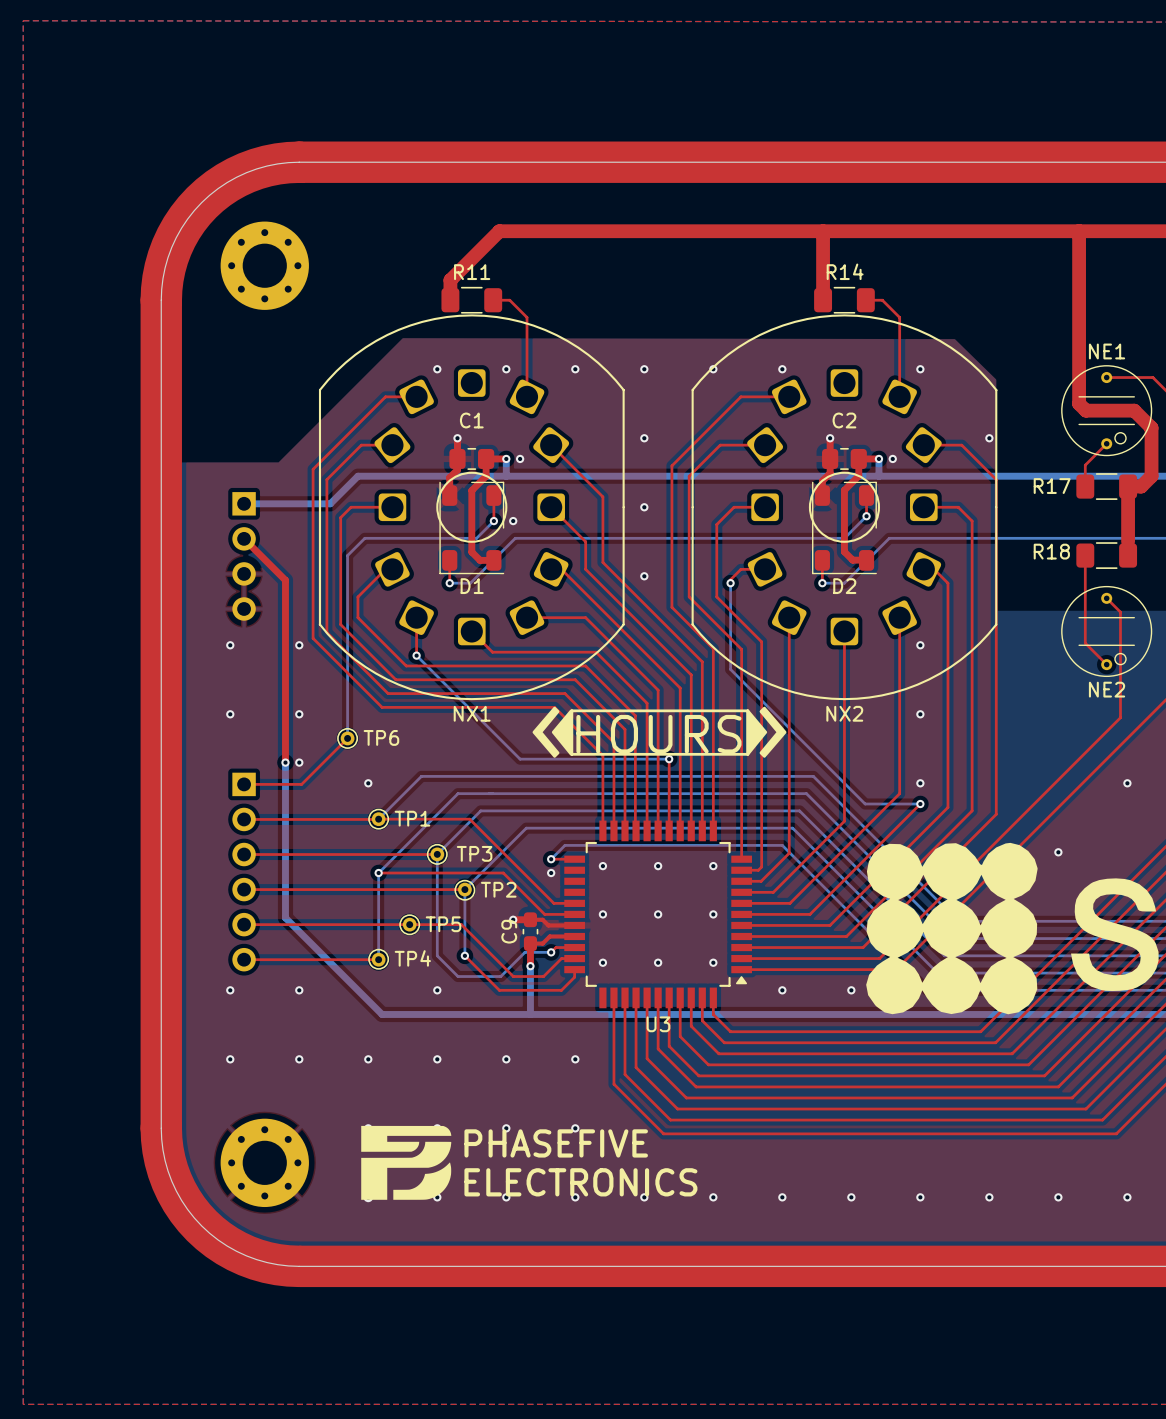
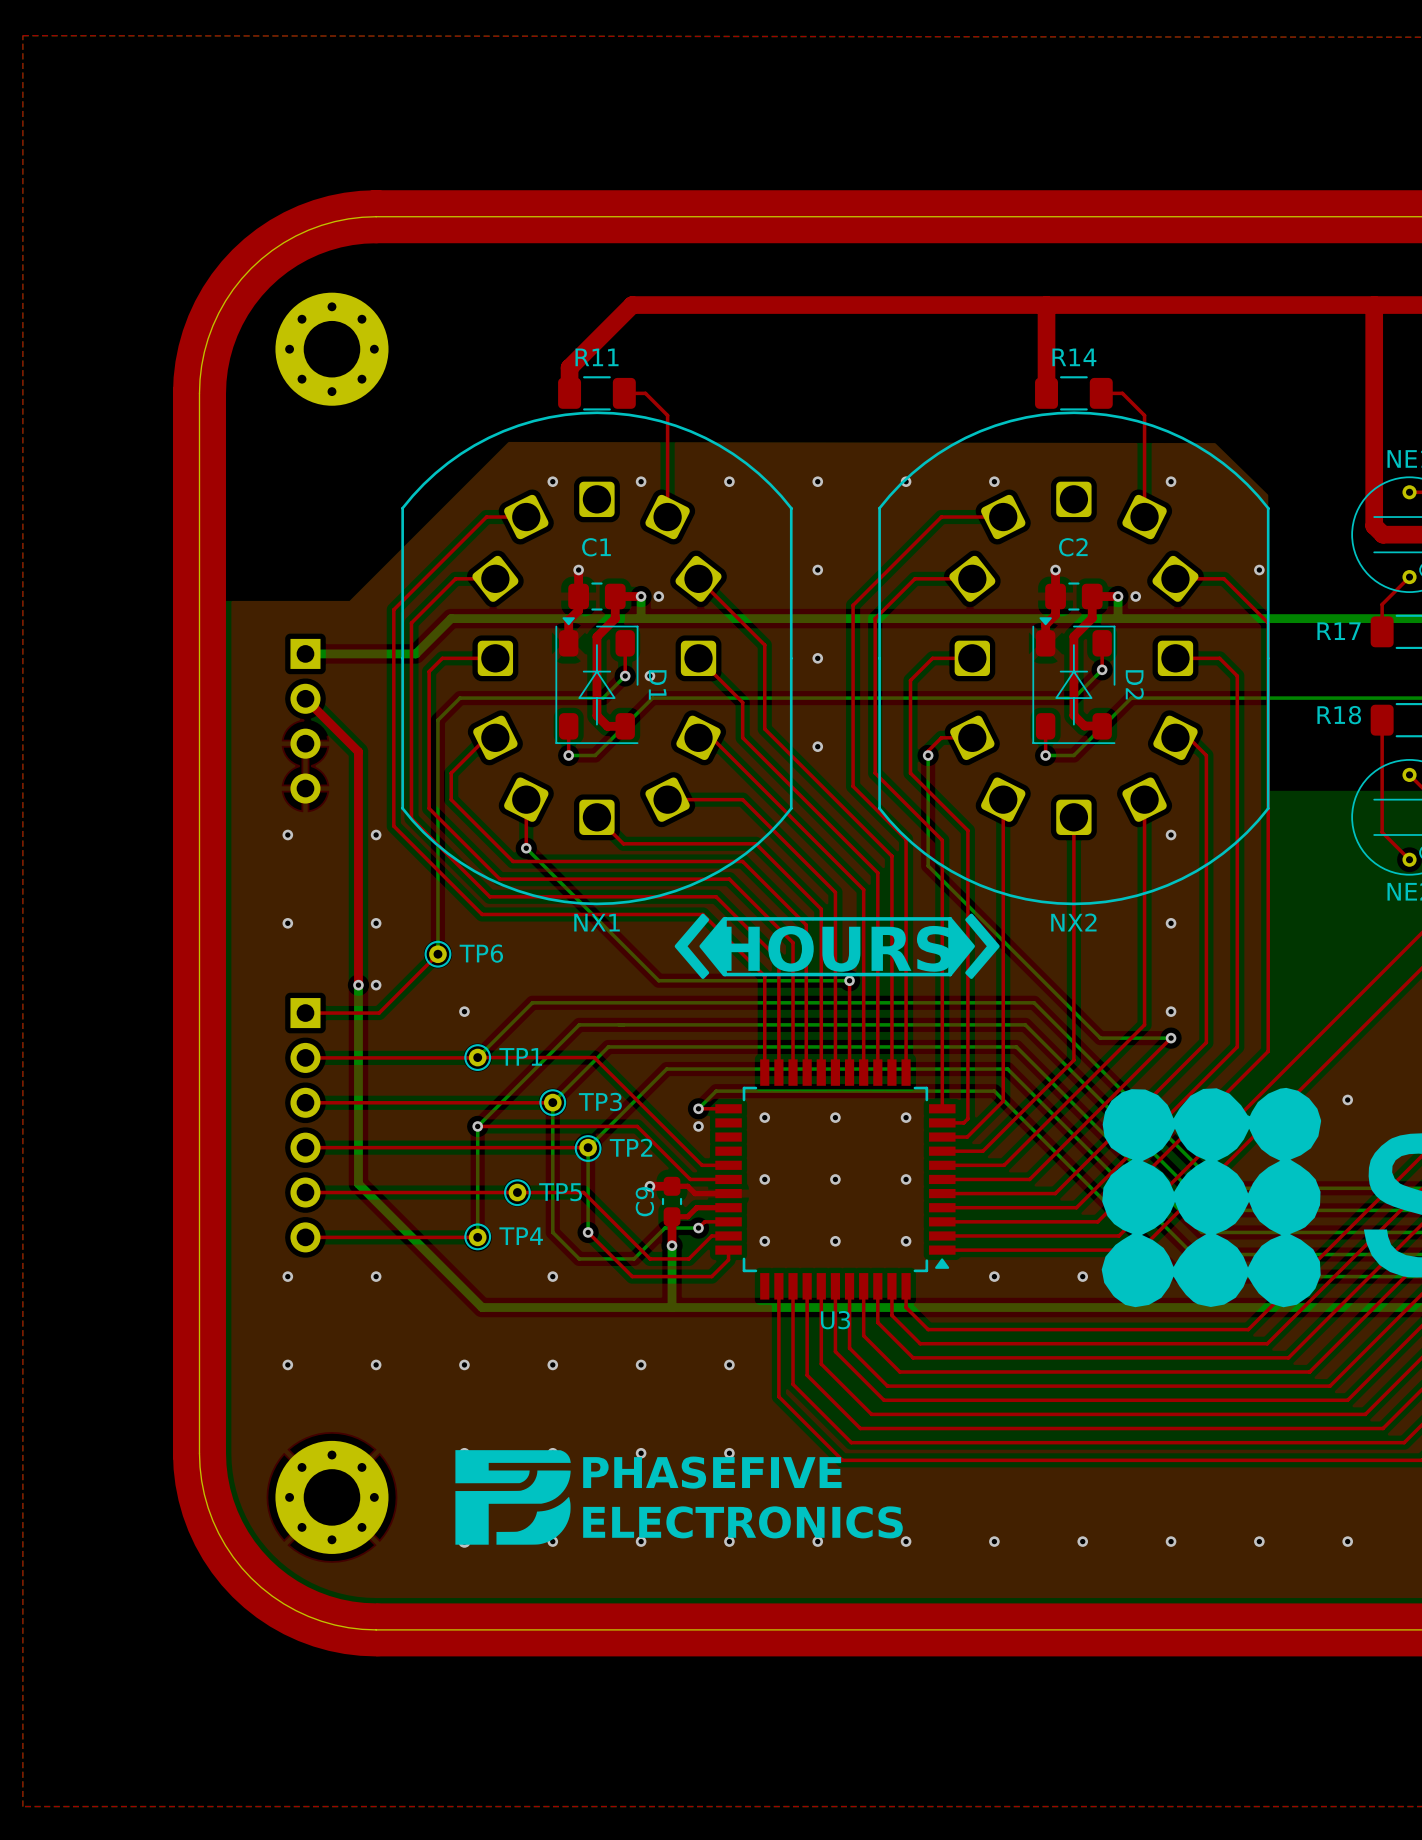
NX1 footprint: [318, 314, 625, 701] -> [401, 411, 793, 906]
NX2 footprint: [691, 314, 998, 701] -> [878, 411, 1270, 906]
D1 footprint: [439, 481, 505, 575] -> [555, 617, 639, 745]
D2 footprint: [812, 481, 877, 575] -> [1032, 617, 1116, 745]
D1 name position: D1 (472, 586) -> D1 (657, 684)
D2 name position: D2 (844, 586) -> D2 (1134, 684)

